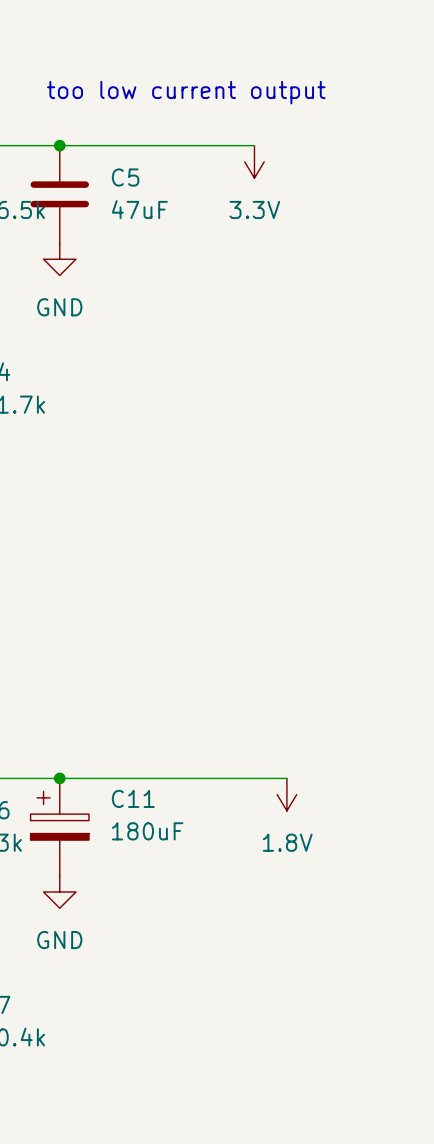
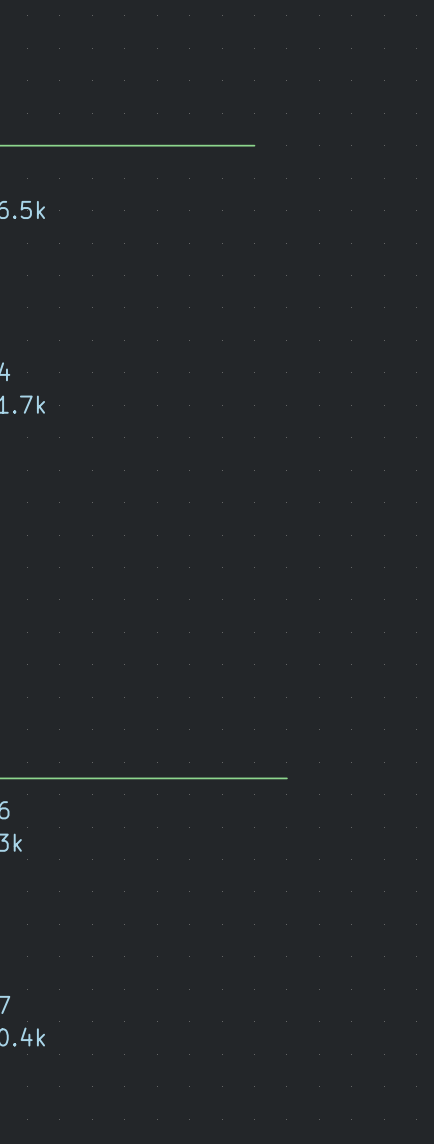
text: too low current output (186, 92) -> none
junction: (59, 145) -> none
power symbol: 3.3V (254, 161) -> none
C5: 47uF (59, 194) -> none
power symbol: GND (59, 259) -> none
junction: (59, 778) -> none
power symbol: 1.8V (286, 794) -> none
C11: 180uF (59, 827) -> none
power symbol: GND (59, 891) -> none

